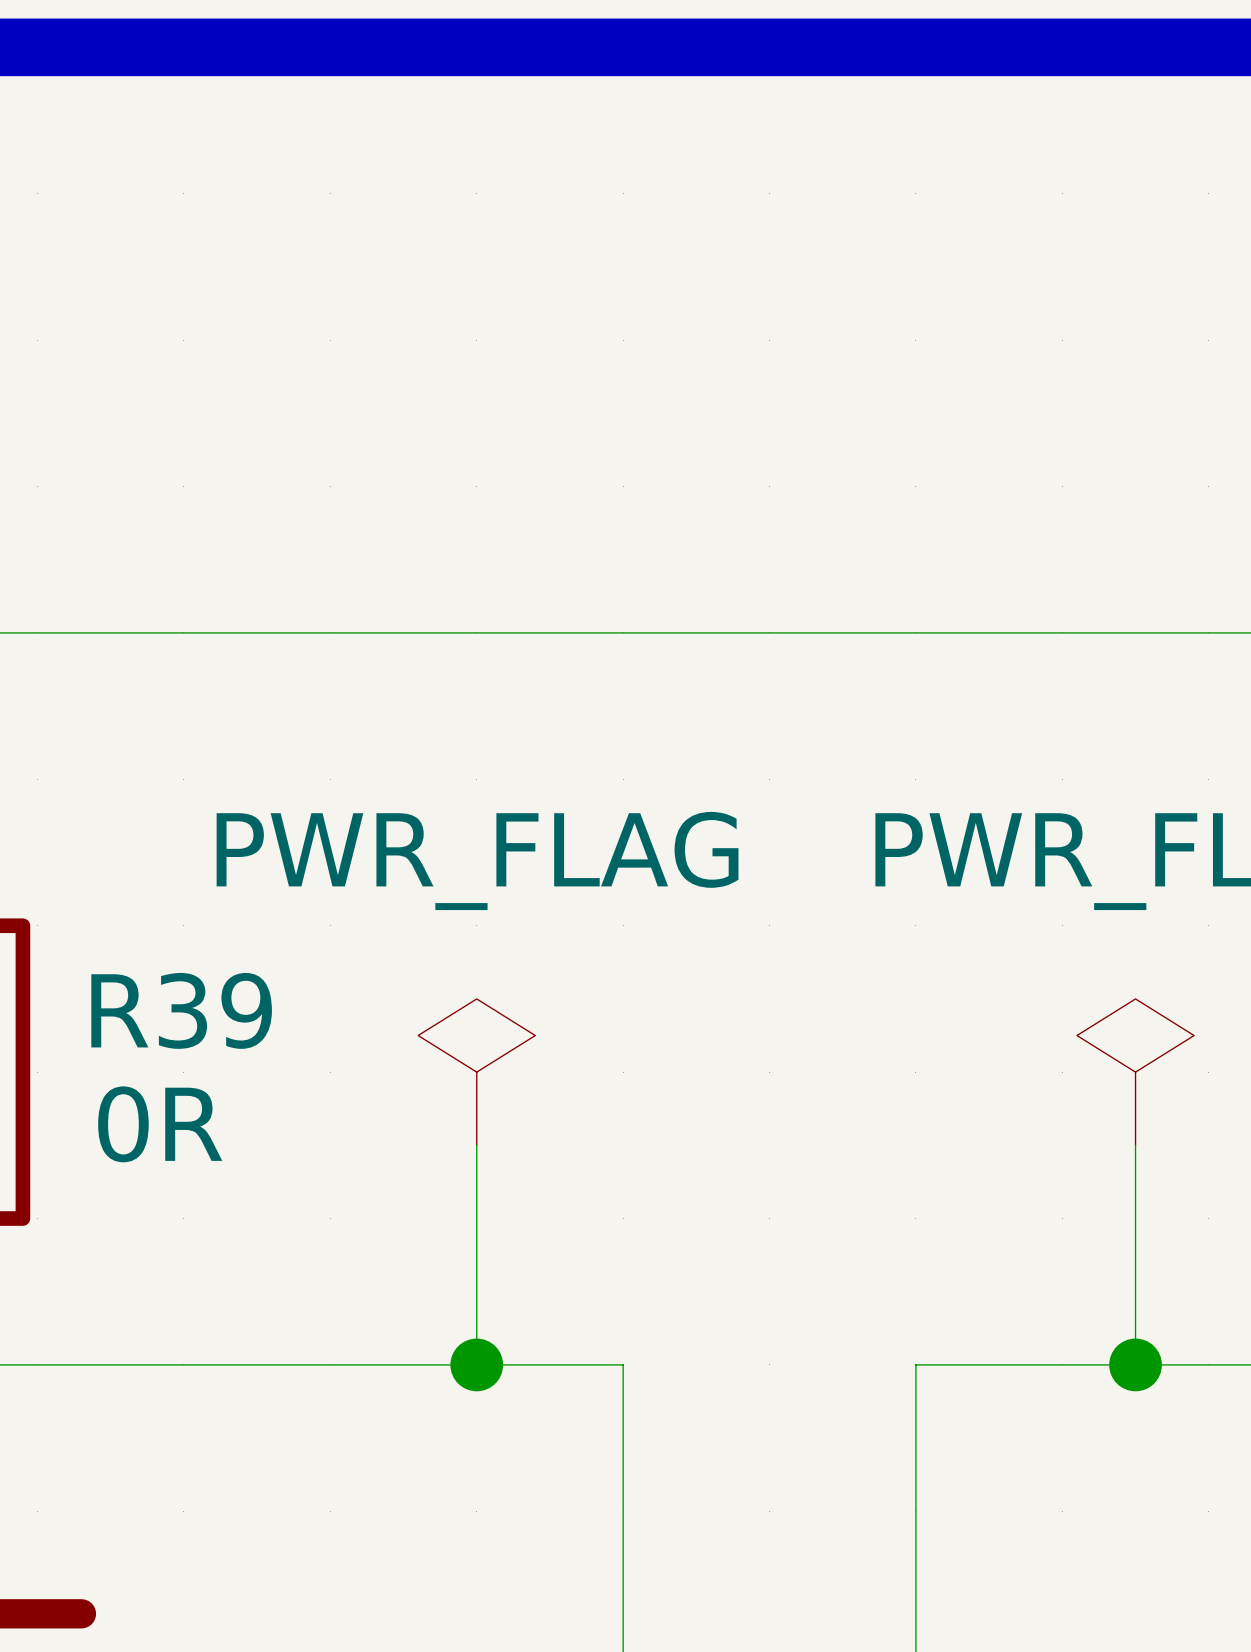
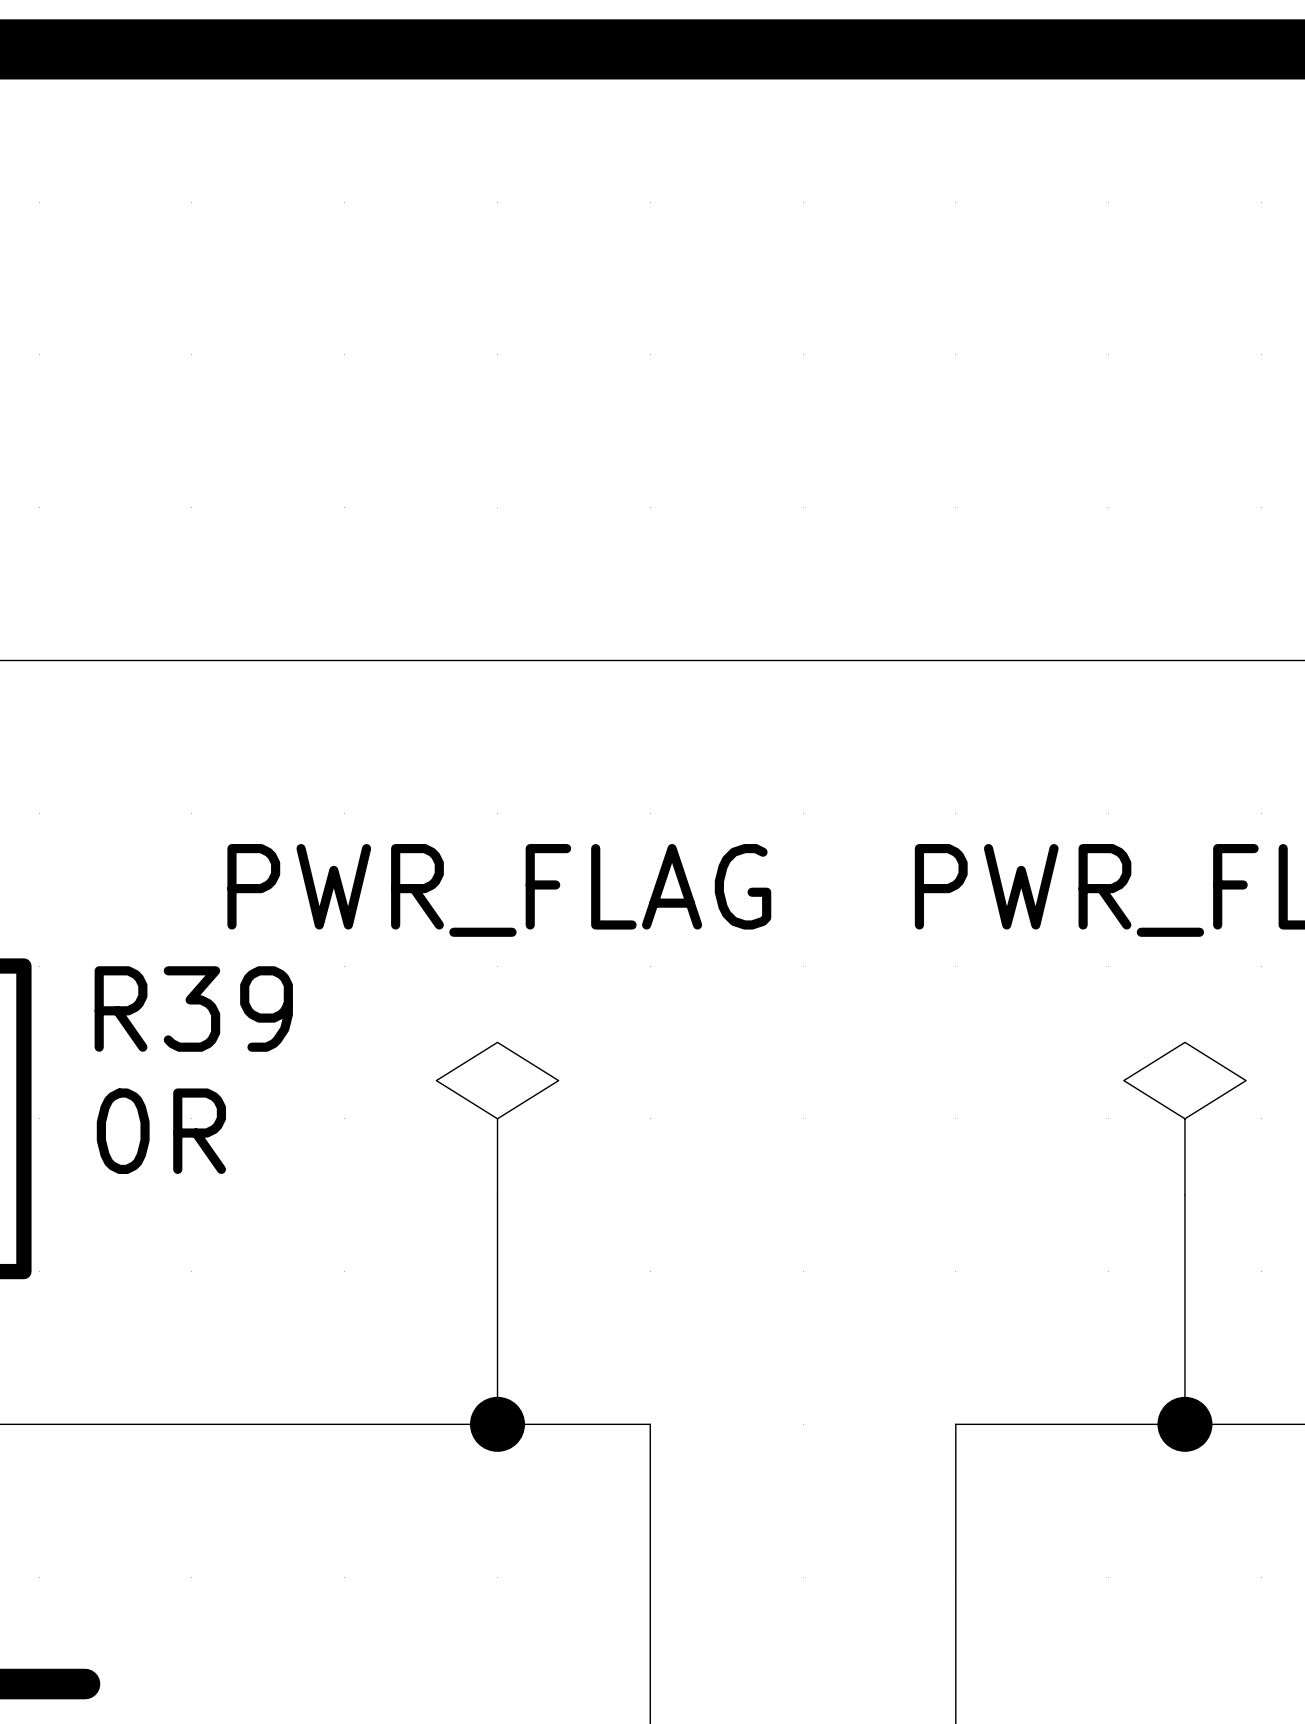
R39 name position: R39 (181, 1010) -> R39 (193, 1009)
R39 text position: 0R (160, 1124) -> 0R (161, 1131)

